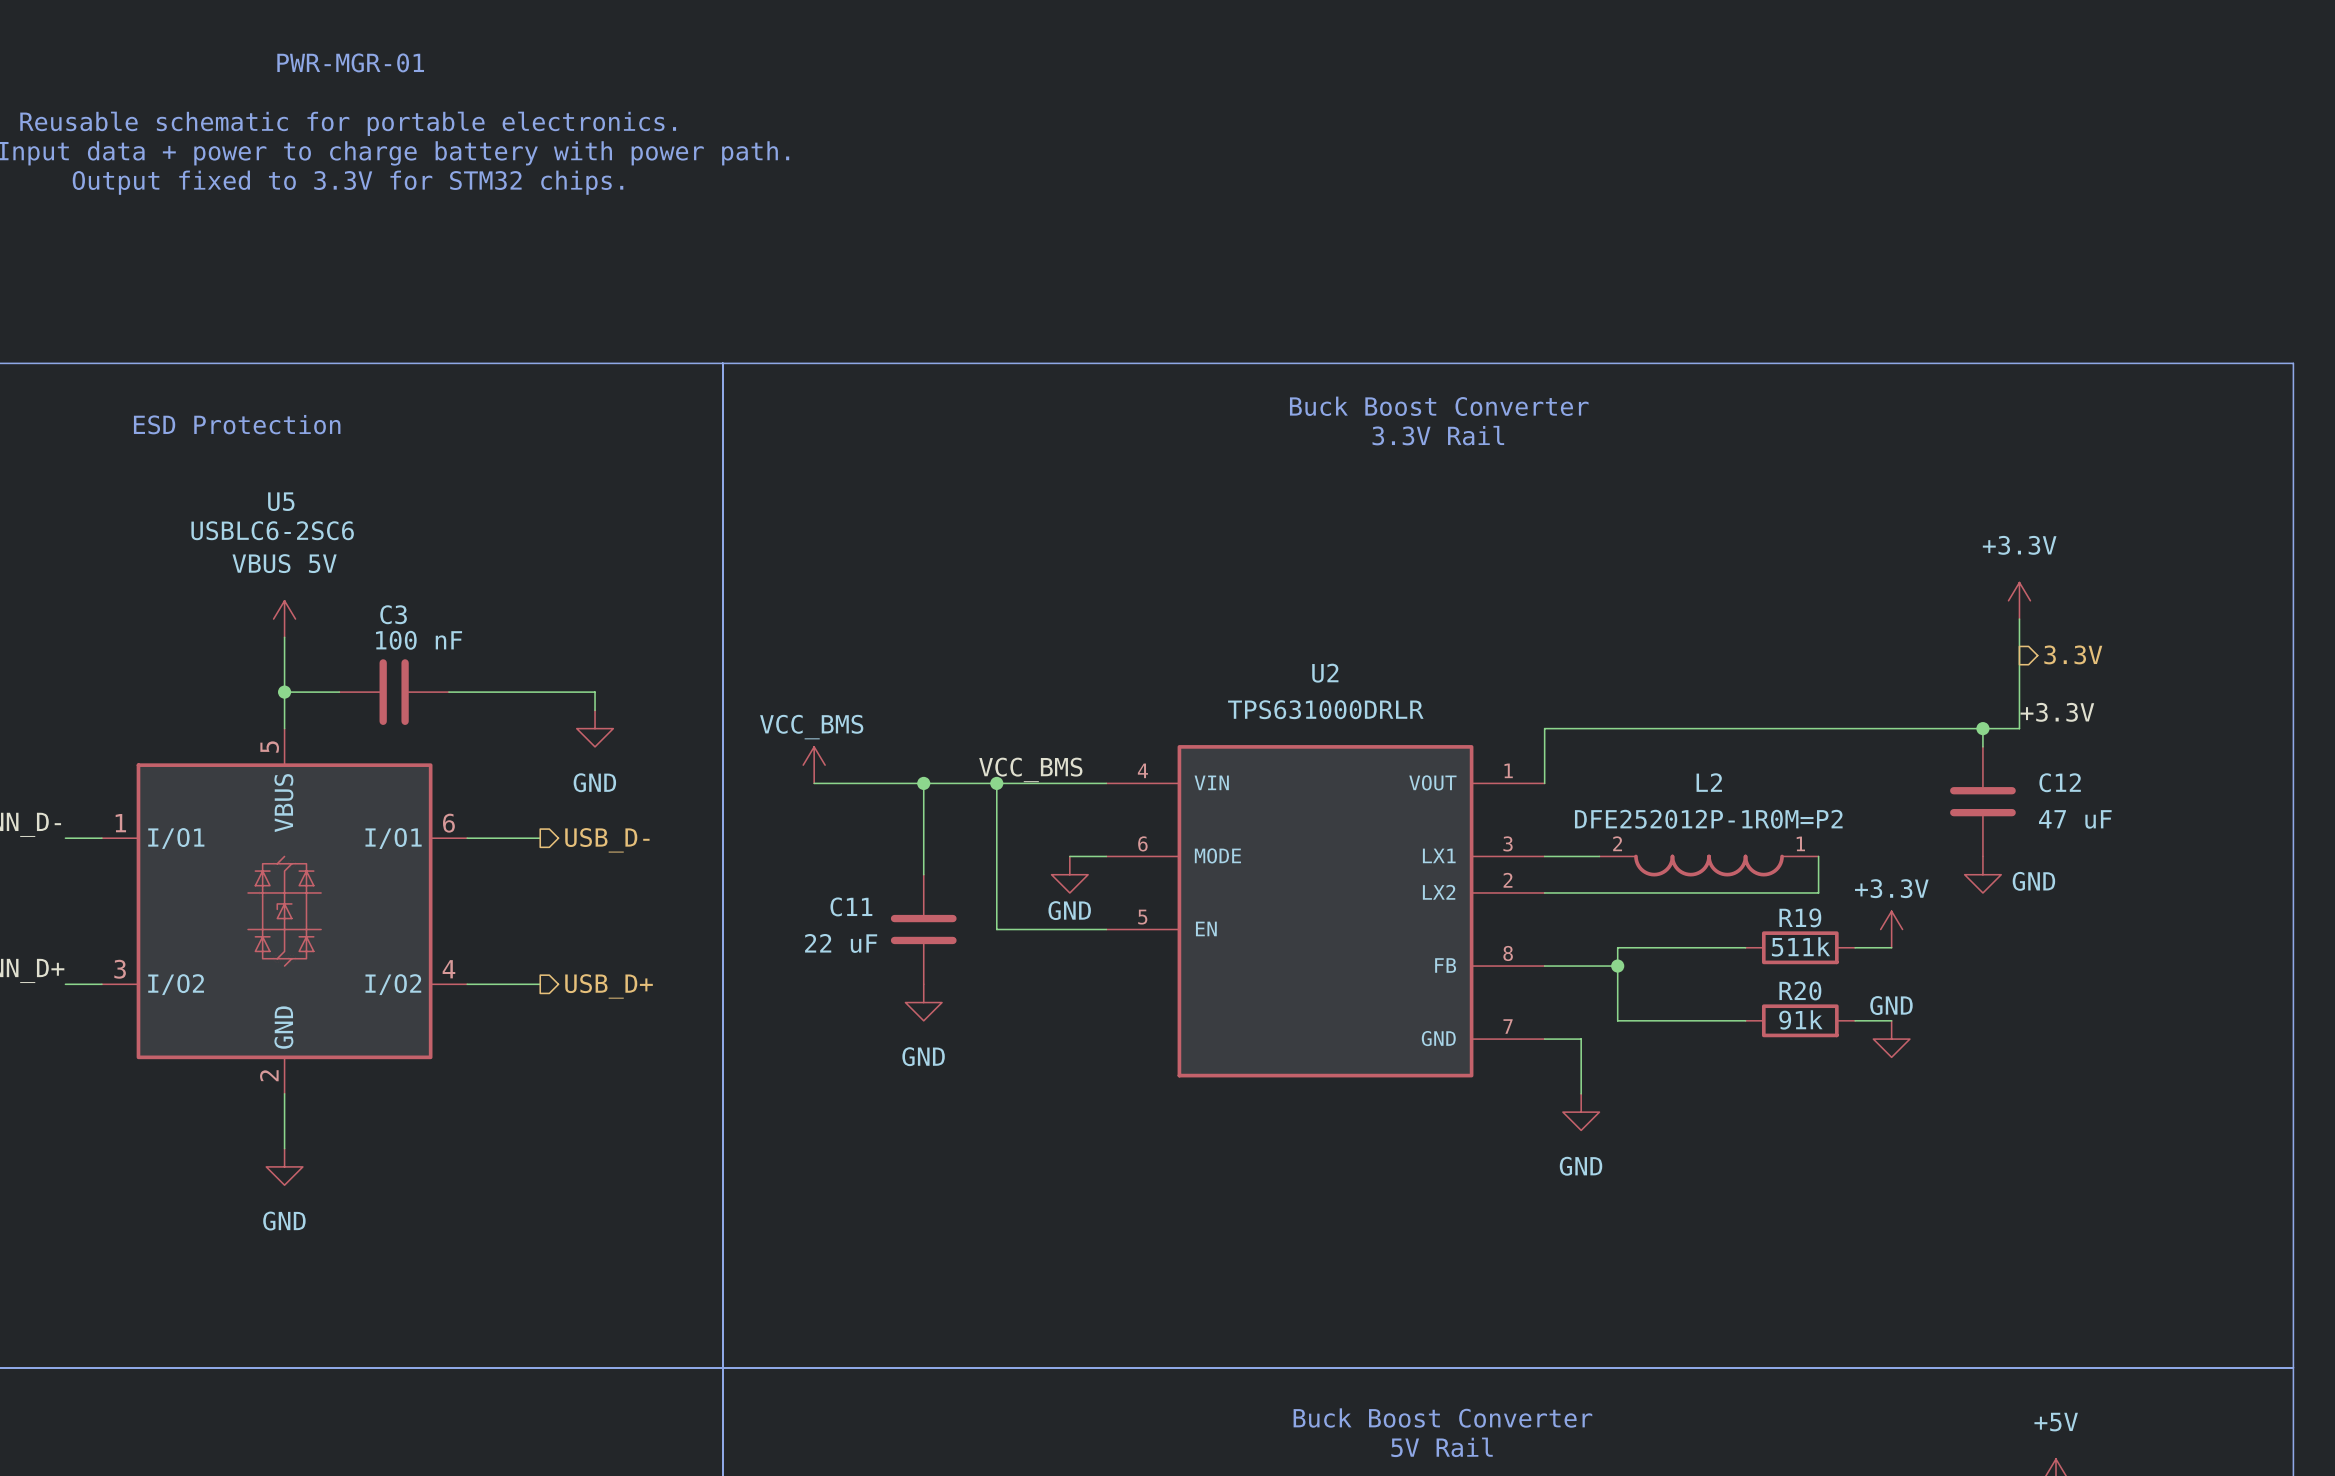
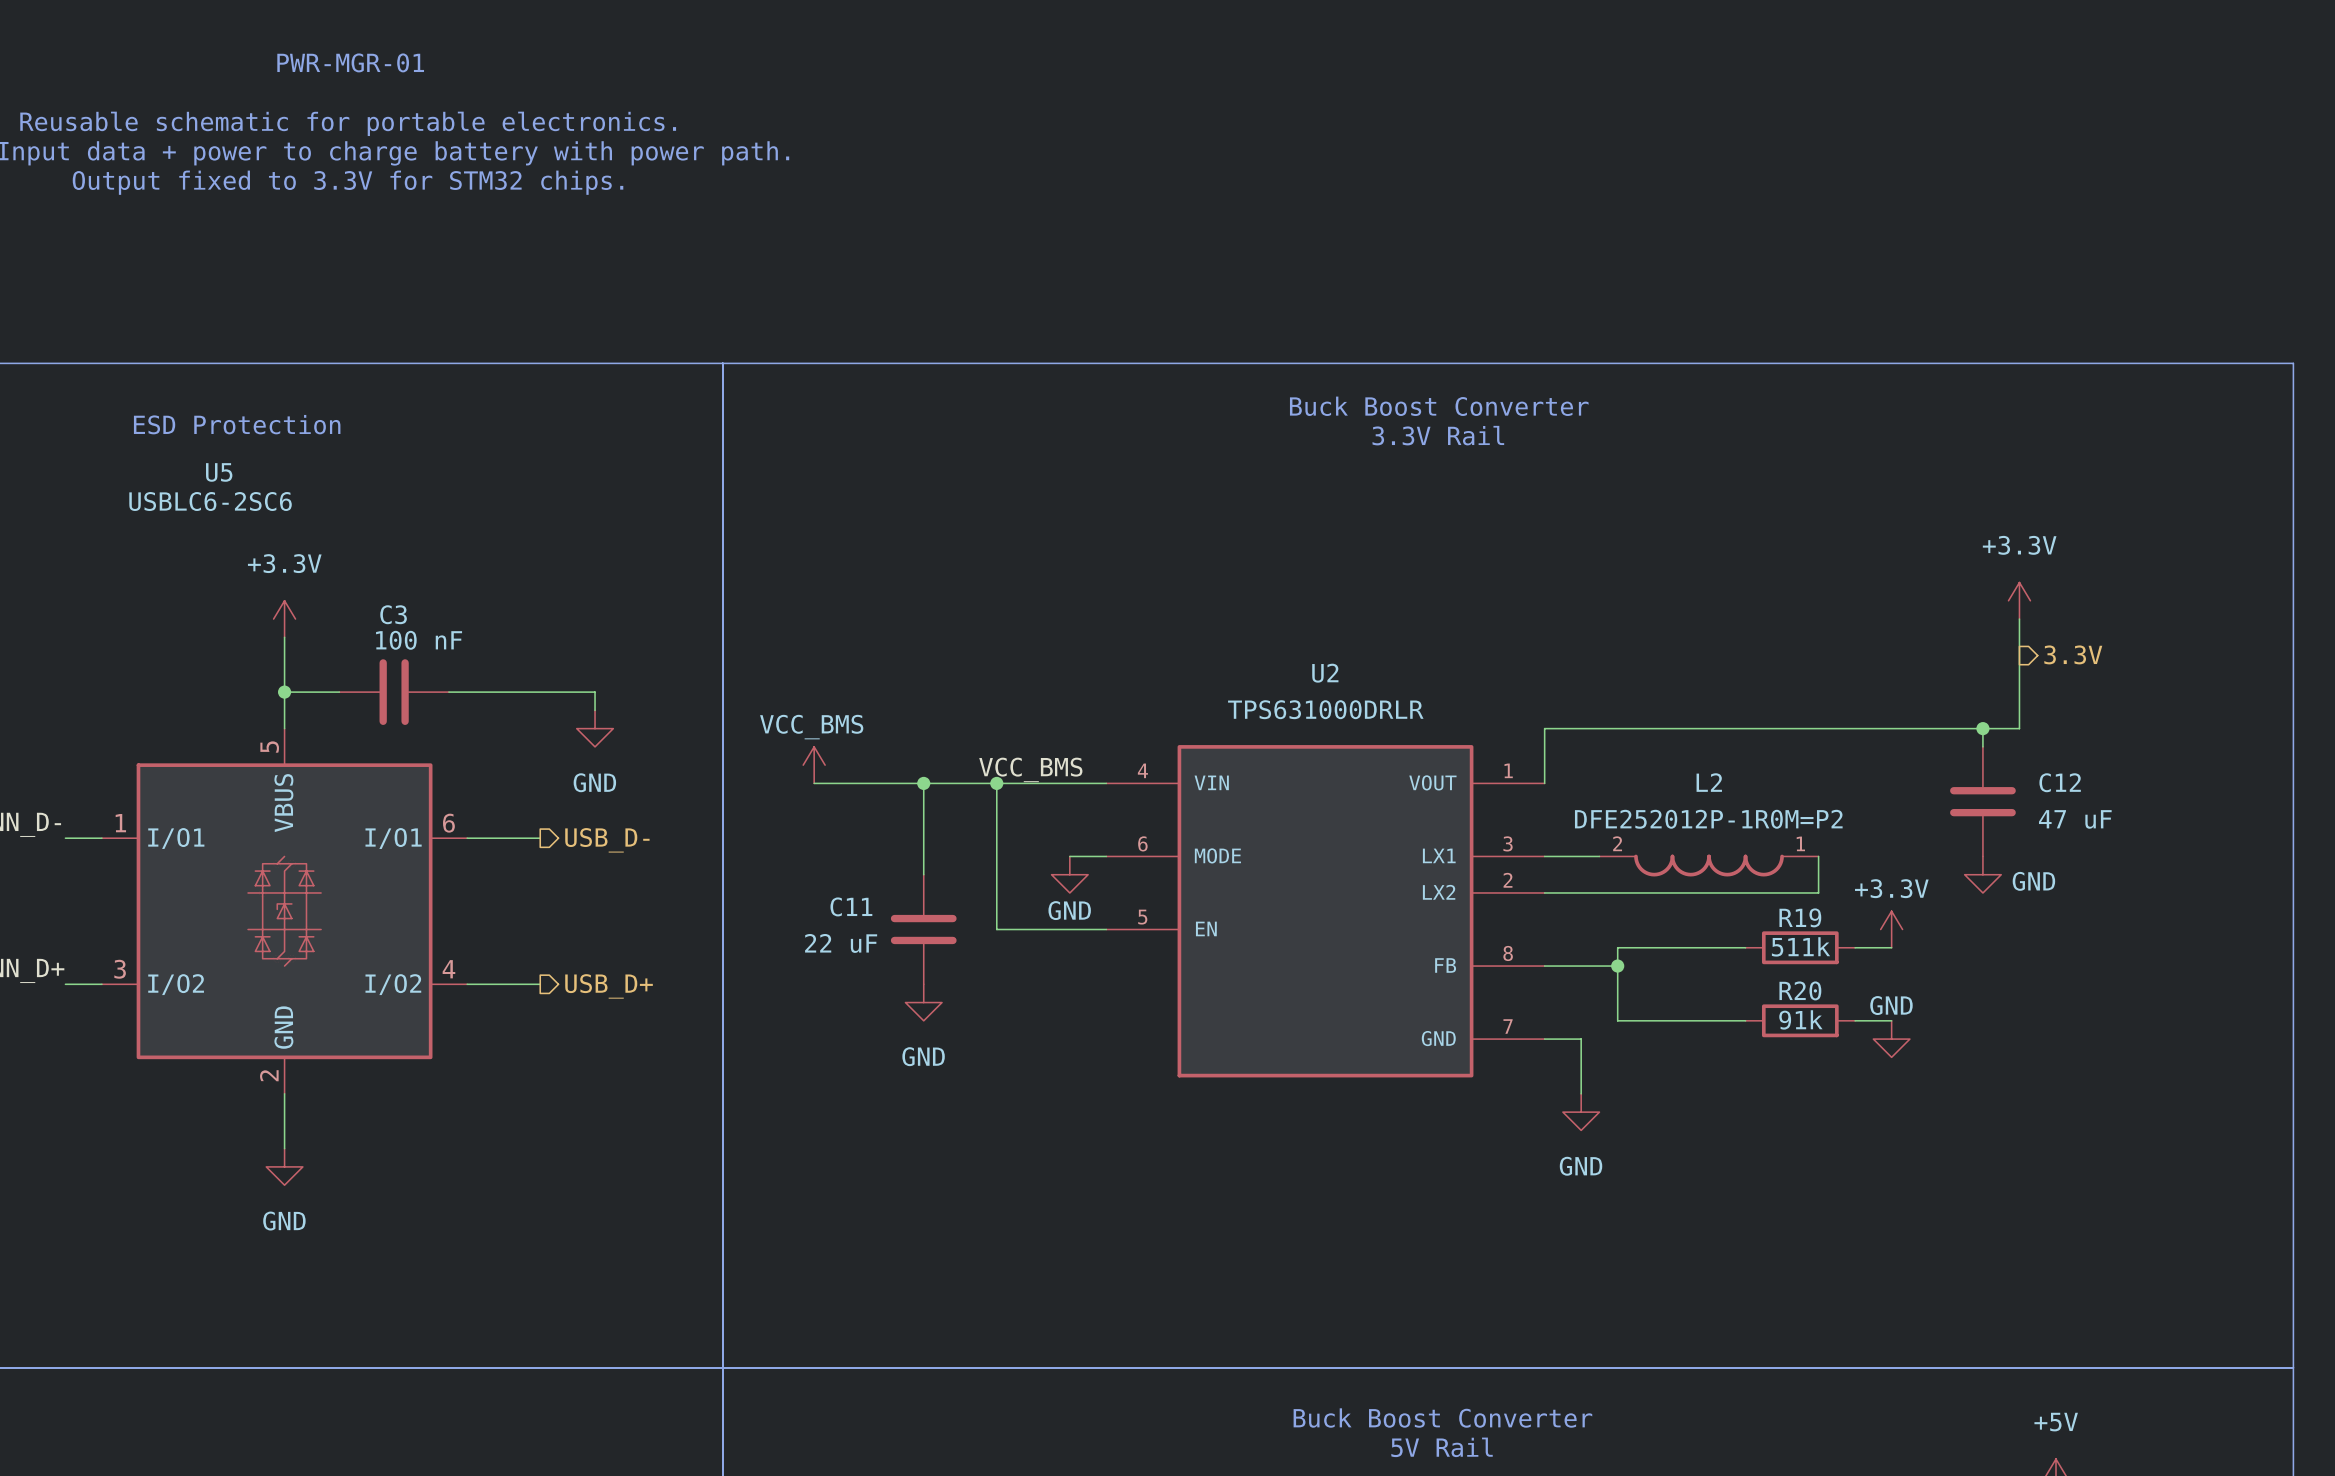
U5 name position: U5 (281, 501) -> U5 (219, 472)
U5 value position: USBLC6-2SC6 (272, 530) -> USBLC6-2SC6 (210, 501)
power symbol: VBUS 5V (284, 619) -> +3.3V (284, 619)
label: +3.3V (2057, 712) -> none

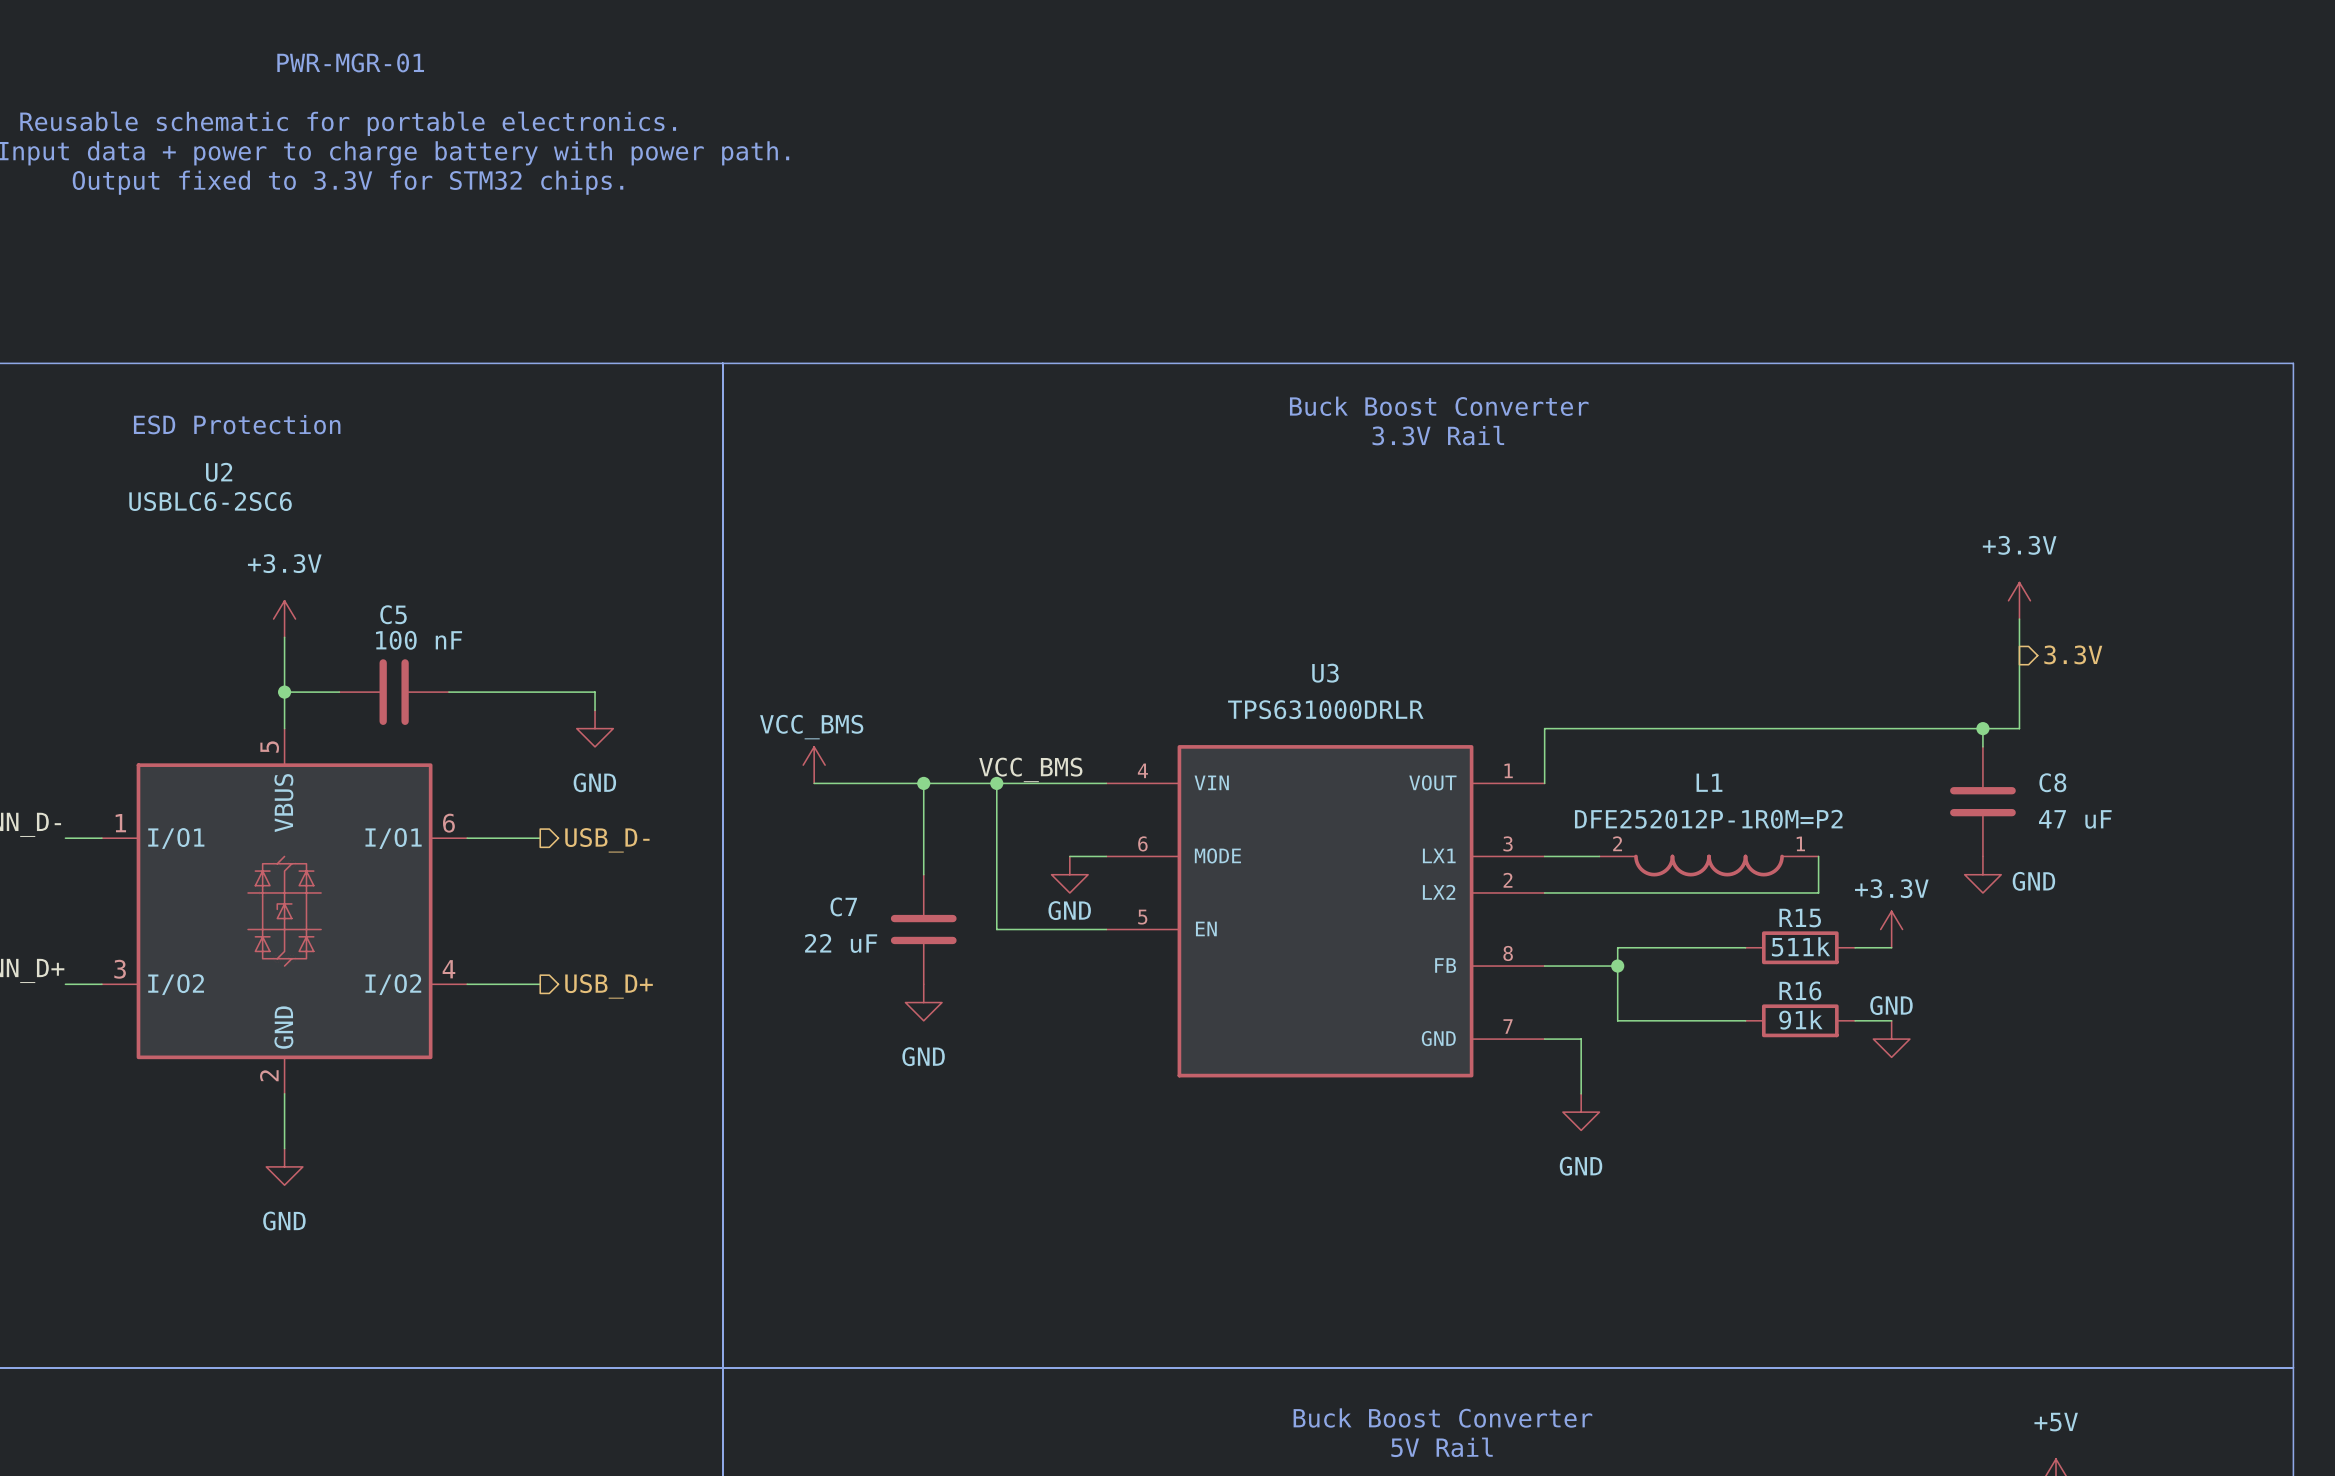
U5 name: U5 (219, 472) -> U2 (219, 472)
C3 name: C3 (393, 614) -> C5 (393, 614)
U2 name: U2 (1325, 673) -> U3 (1325, 673)
L2 name: L2 (1709, 782) -> L1 (1709, 782)
C12 name: C12 (2060, 782) -> C8 (2052, 782)
C11 name: C11 (851, 906) -> C7 (843, 906)
R19 name: R19 (1800, 917) -> R15 (1800, 918)
R20 name: R20 (1800, 990) -> R16 (1800, 990)

